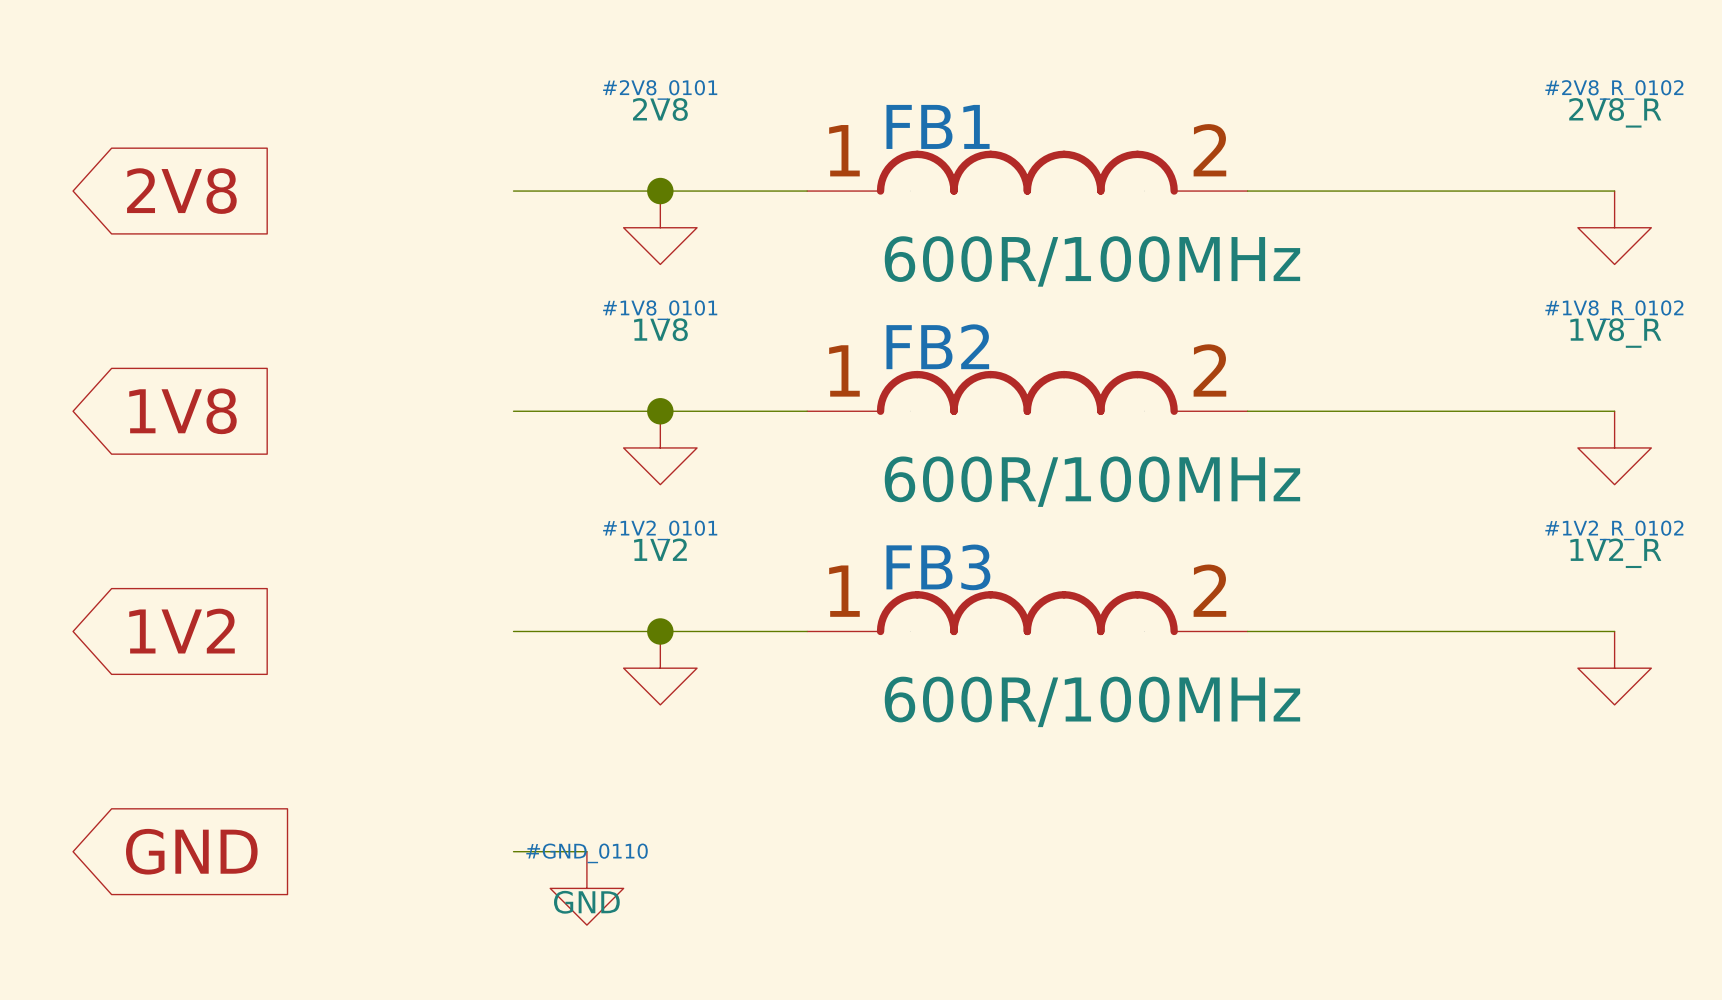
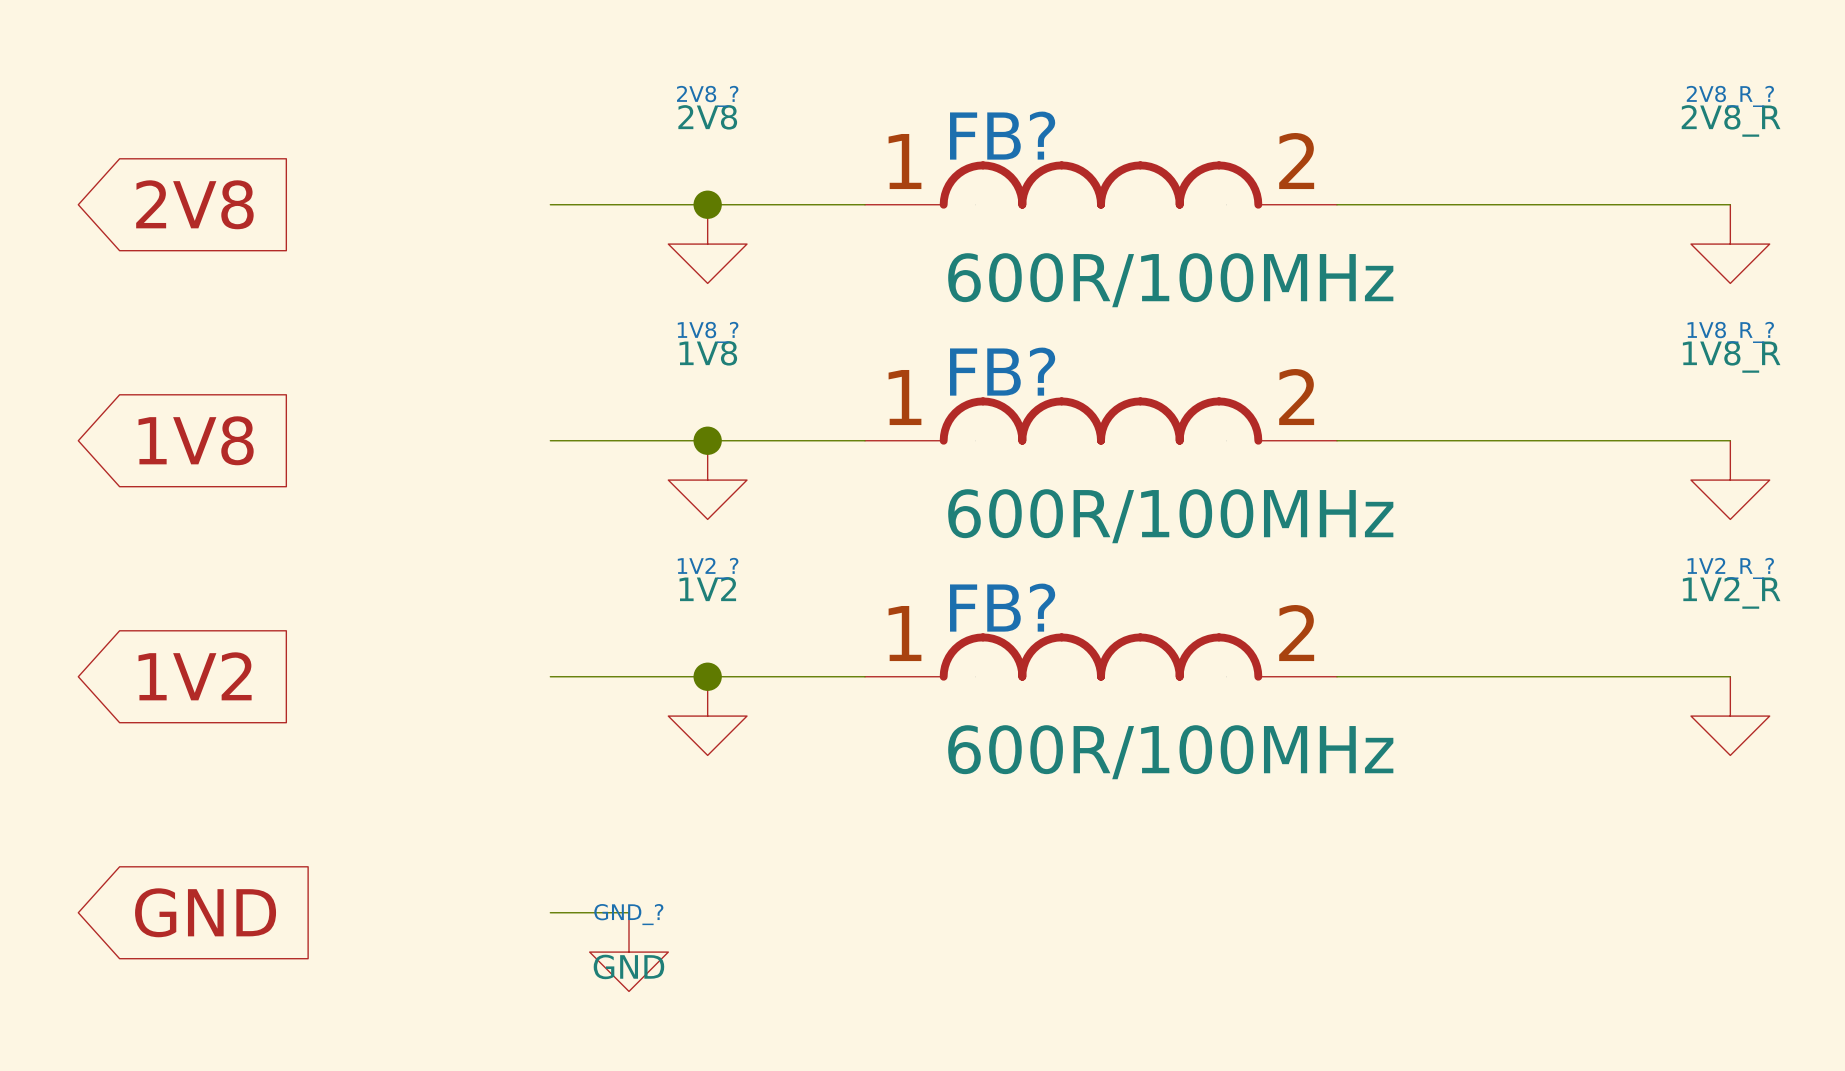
#2V8_0101 name: #2V8_0101 (660, 89) -> 2V8_? (707, 96)
#2V8_R_0102 name: #2V8_R_0102 (1614, 89) -> 2V8_R_? (1730, 96)
FB1 name: FB1 (938, 126) -> FB? (1002, 135)
#1V8_0101 name: #1V8_0101 (660, 310) -> 1V8_? (708, 332)
#1V8_R_0102 name: #1V8_R_0102 (1614, 310) -> 1V8_R_? (1730, 332)
FB2 name: FB2 (937, 346) -> FB? (1002, 371)
#1V2_0101 name: #1V2_0101 (660, 530) -> 1V2_? (708, 568)
#1V2_R_0102 name: #1V2_R_0102 (1614, 530) -> 1V2_R_? (1730, 568)
FB3 name: FB3 (938, 567) -> FB? (1002, 607)
#GND_0110 name: #GND_0110 (587, 853) -> GND_? (628, 914)

